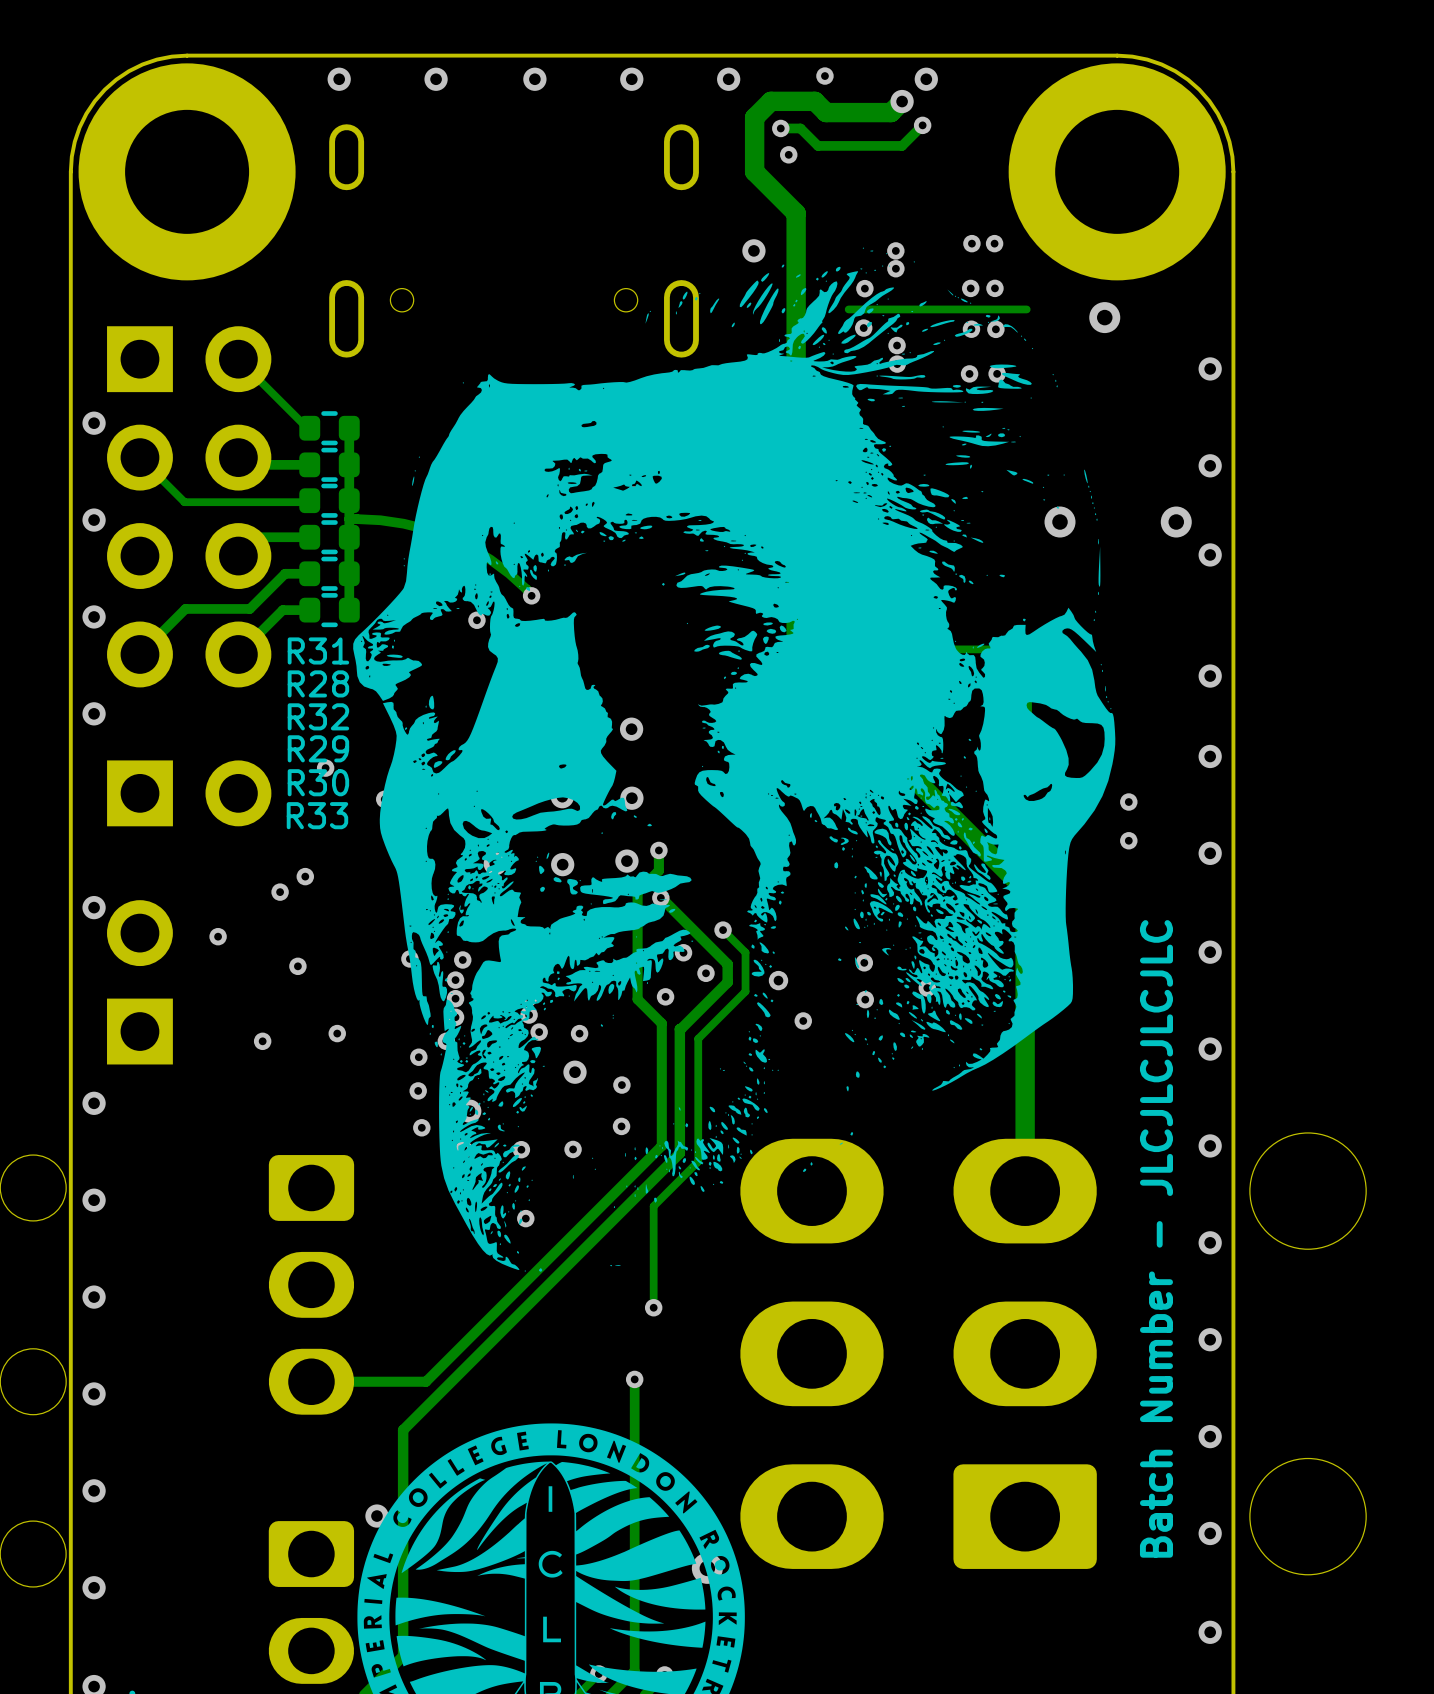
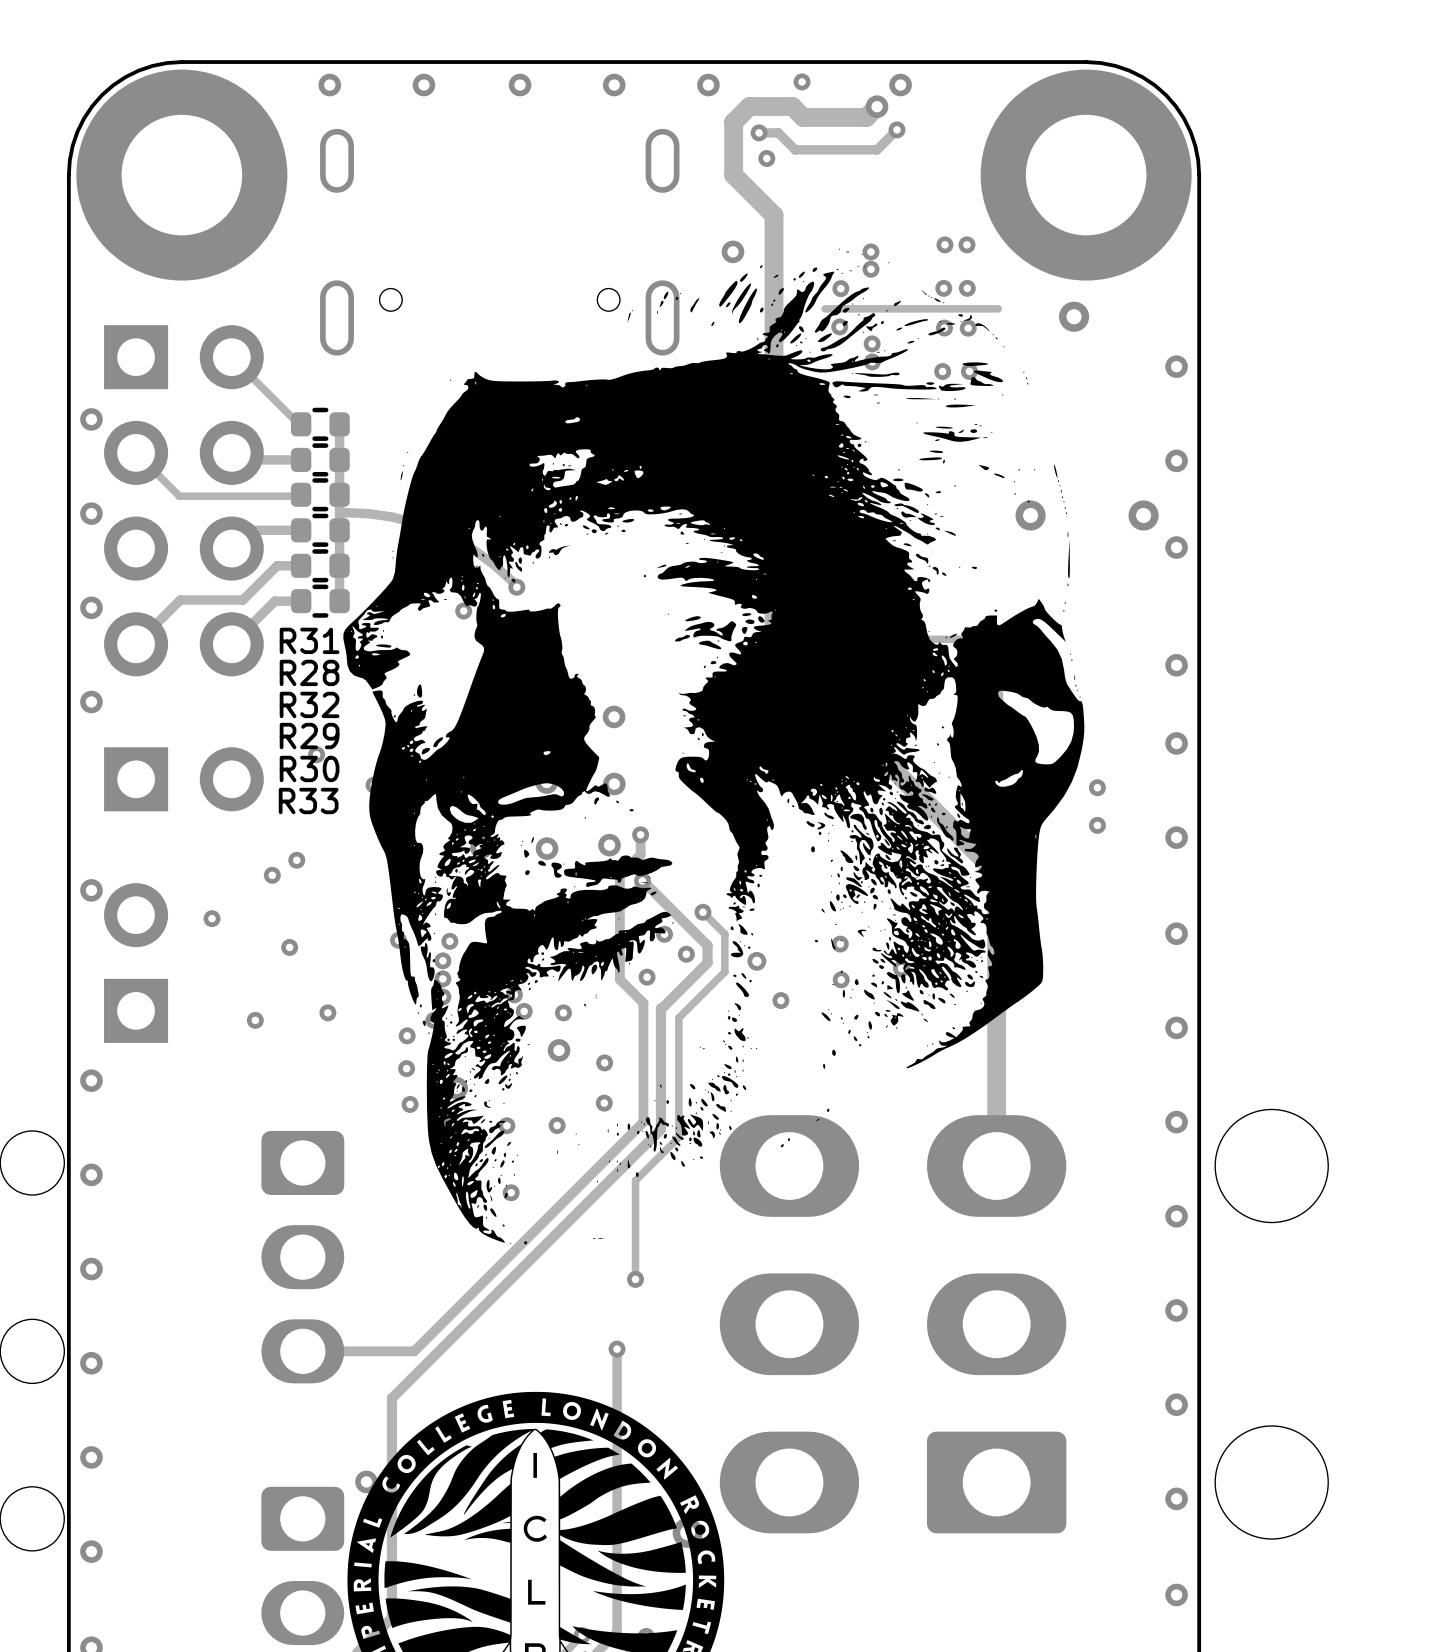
text: Batch Number - JLCJLCJLCJLC (1156, 1238) -> none

